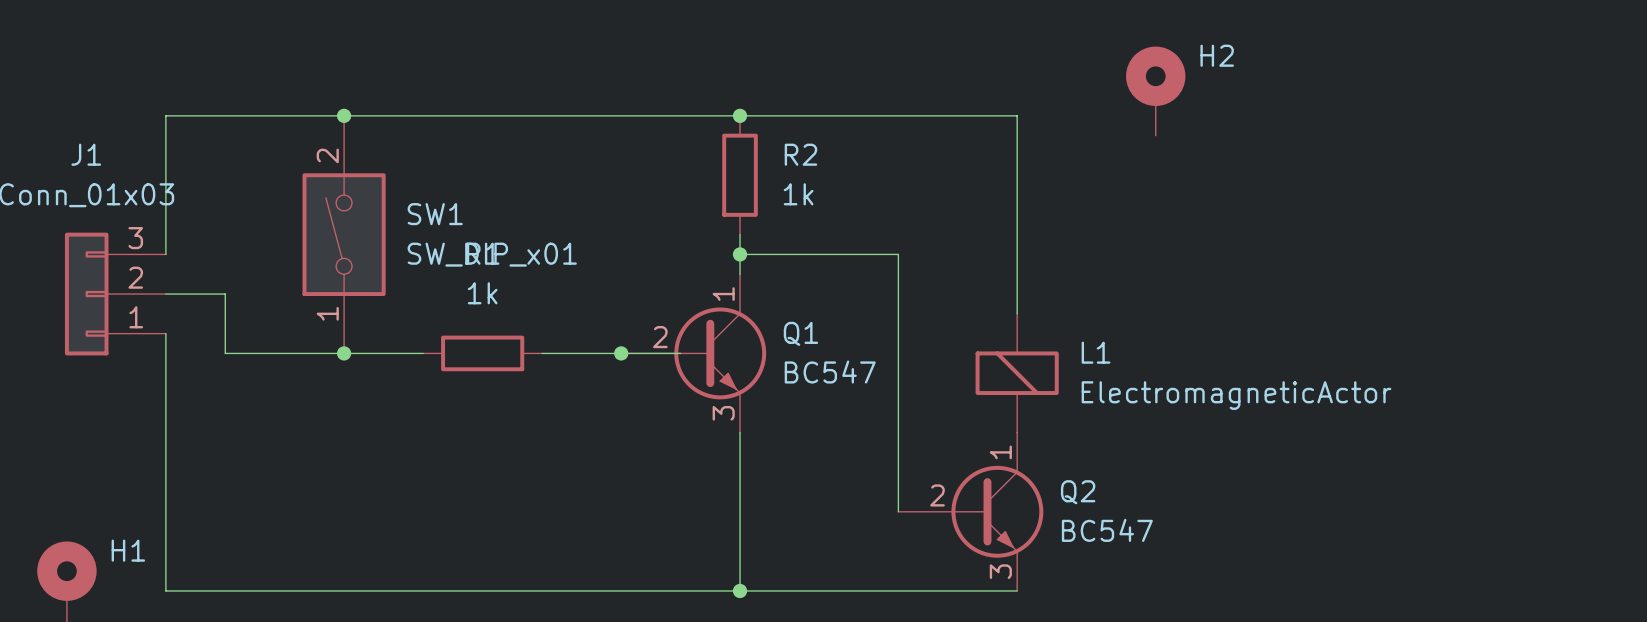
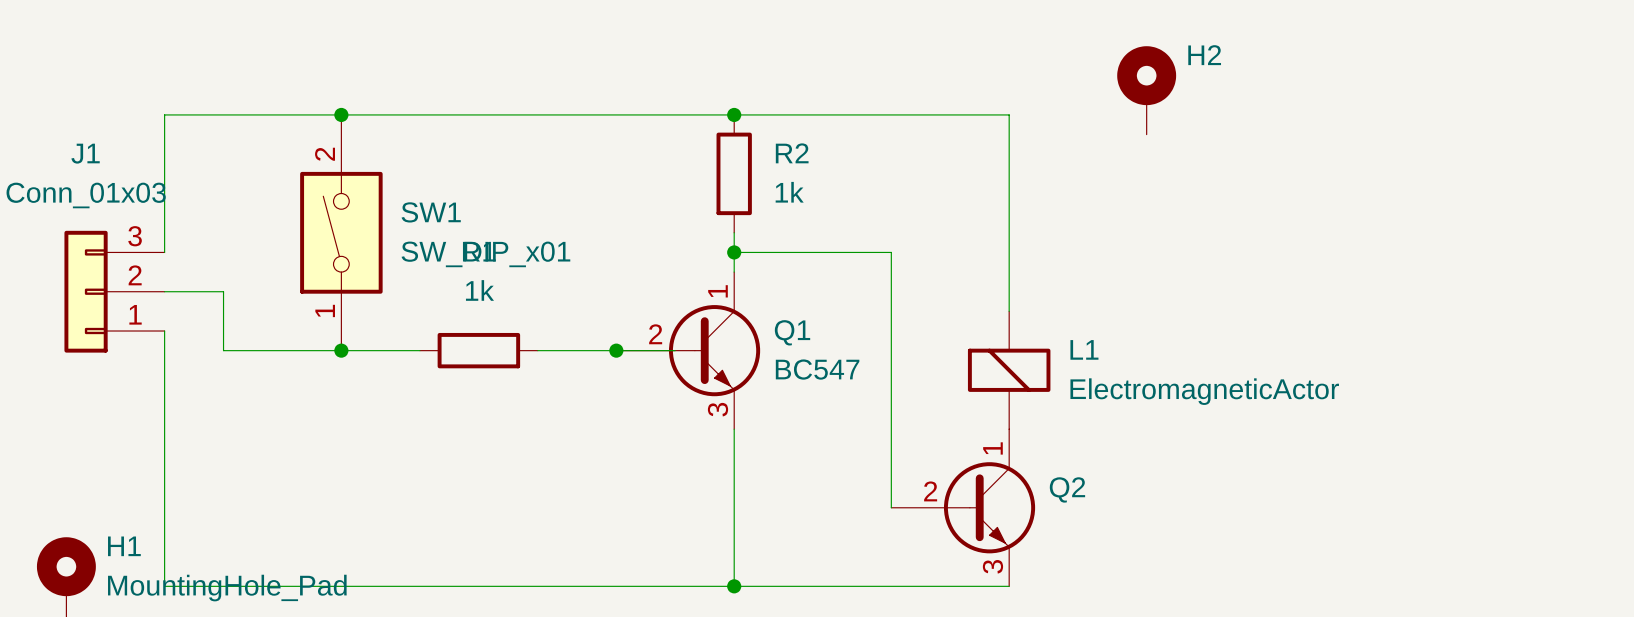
Q2 value: BC547 (1107, 530) -> none
H1 value: none -> MountingHole_Pad (227, 588)

